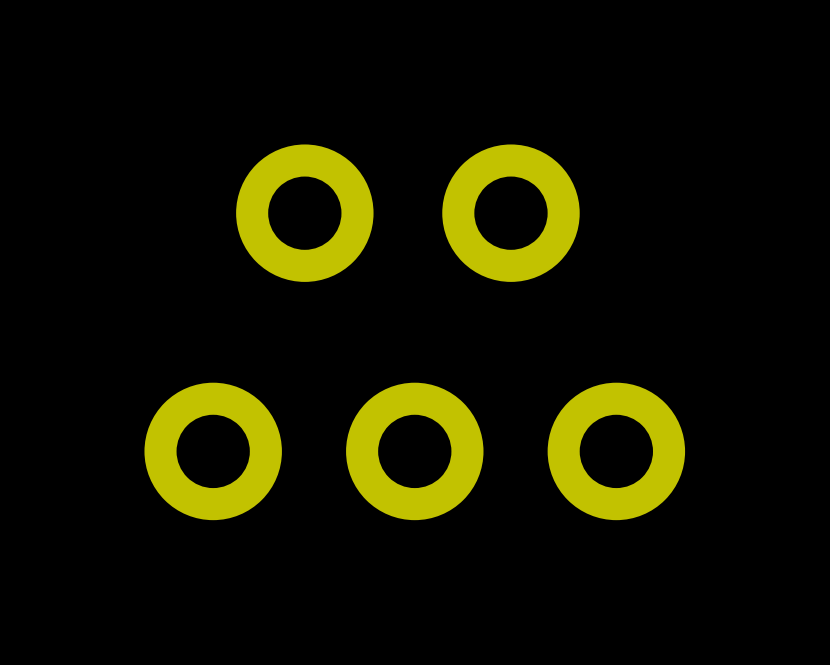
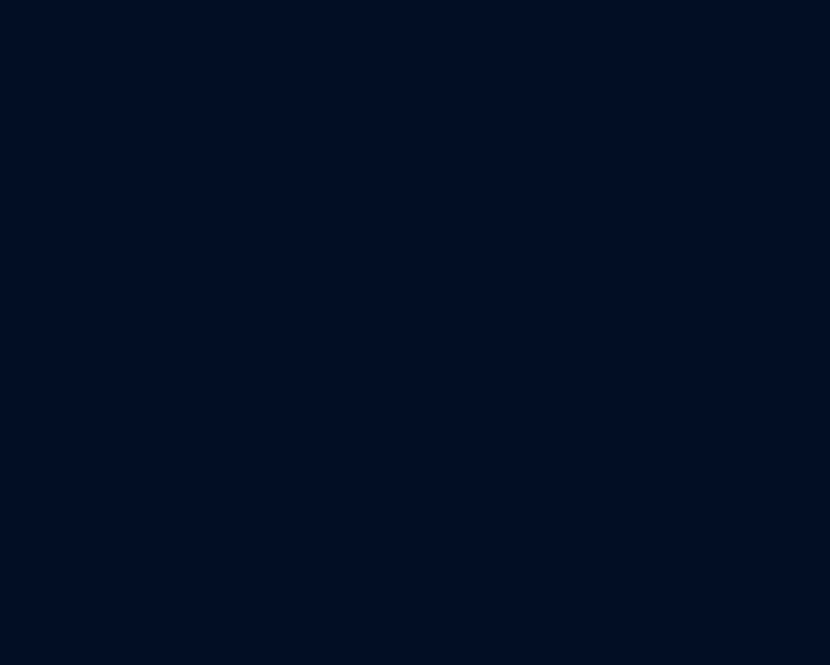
part: (304, 213) -> none
part: (510, 213) -> none
part: (213, 451) -> none
part: (414, 451) -> none
part: (616, 451) -> none

